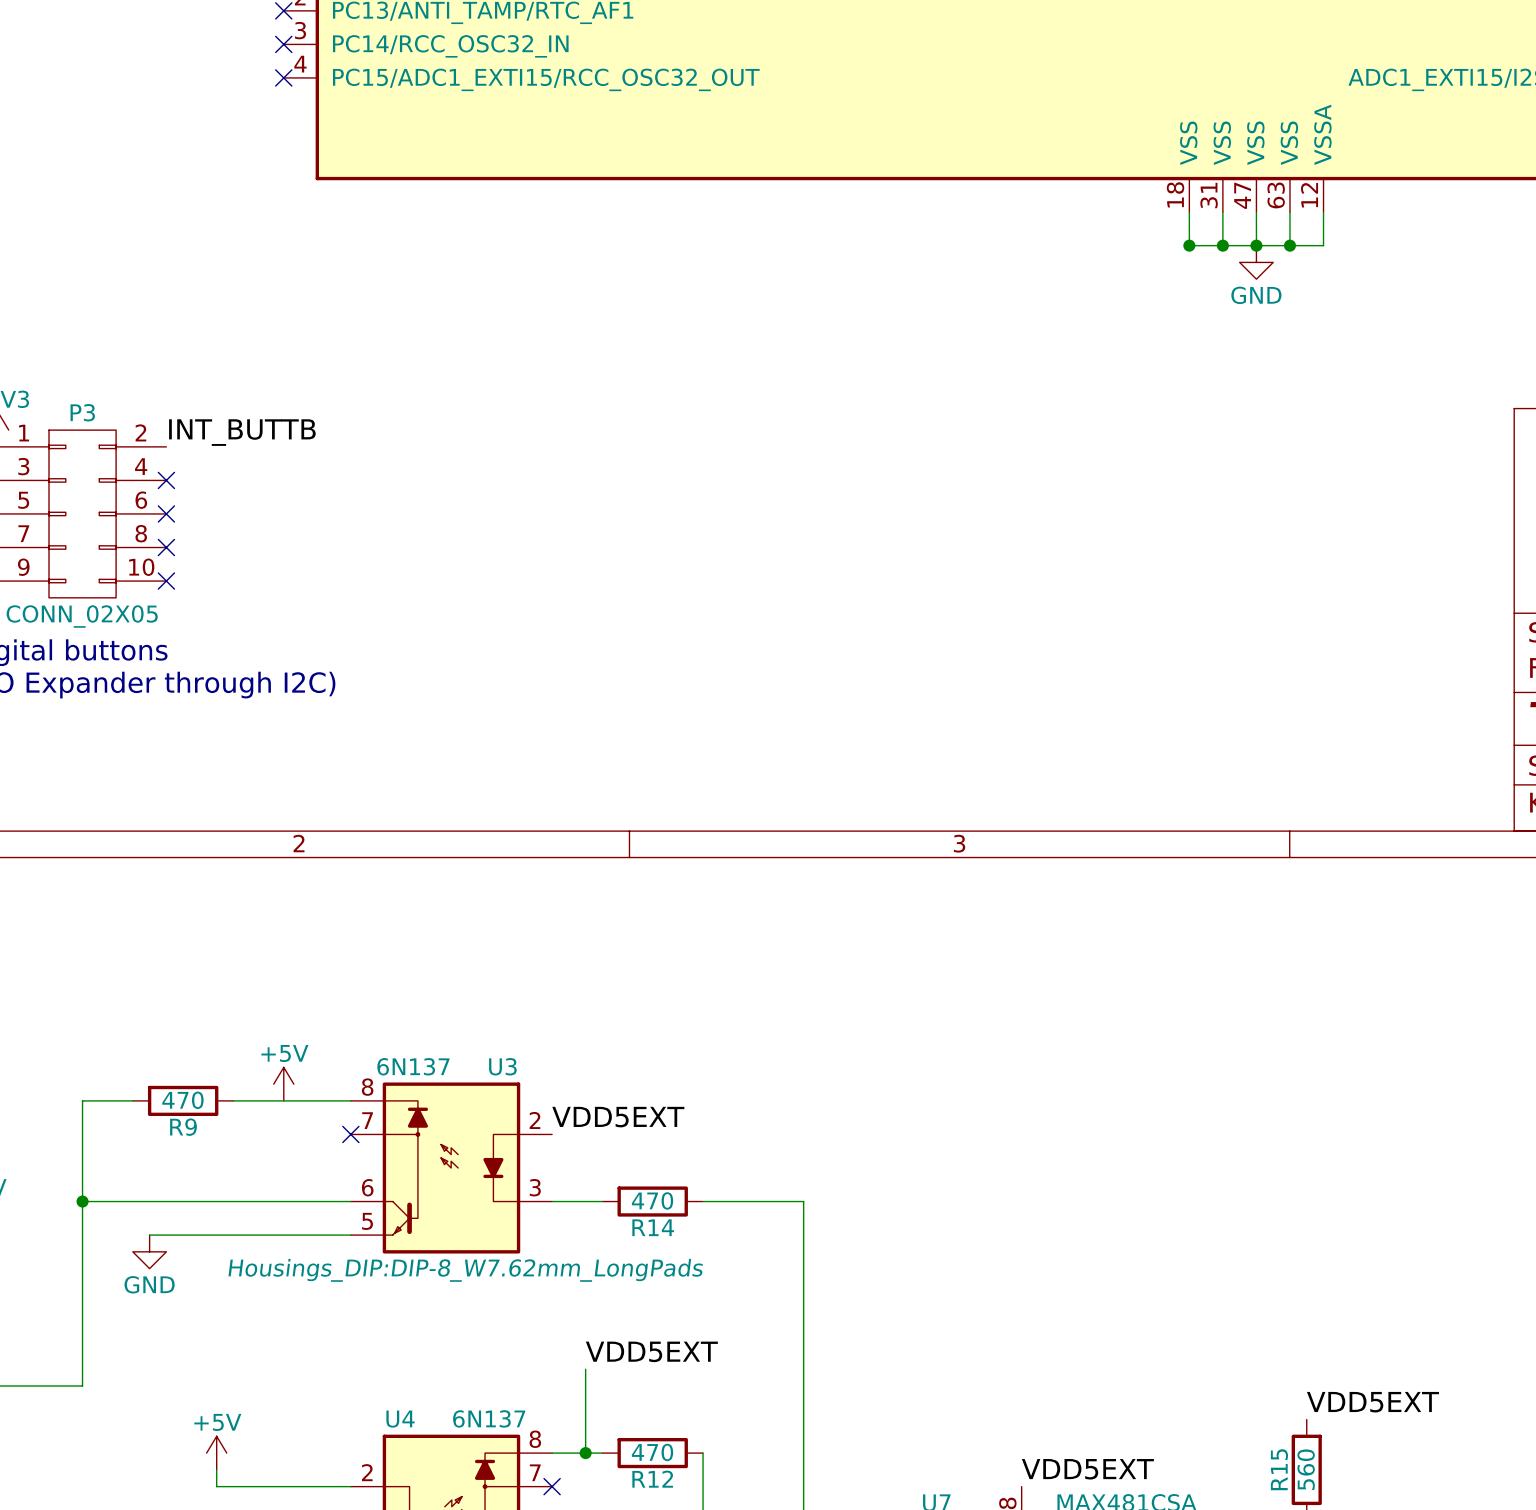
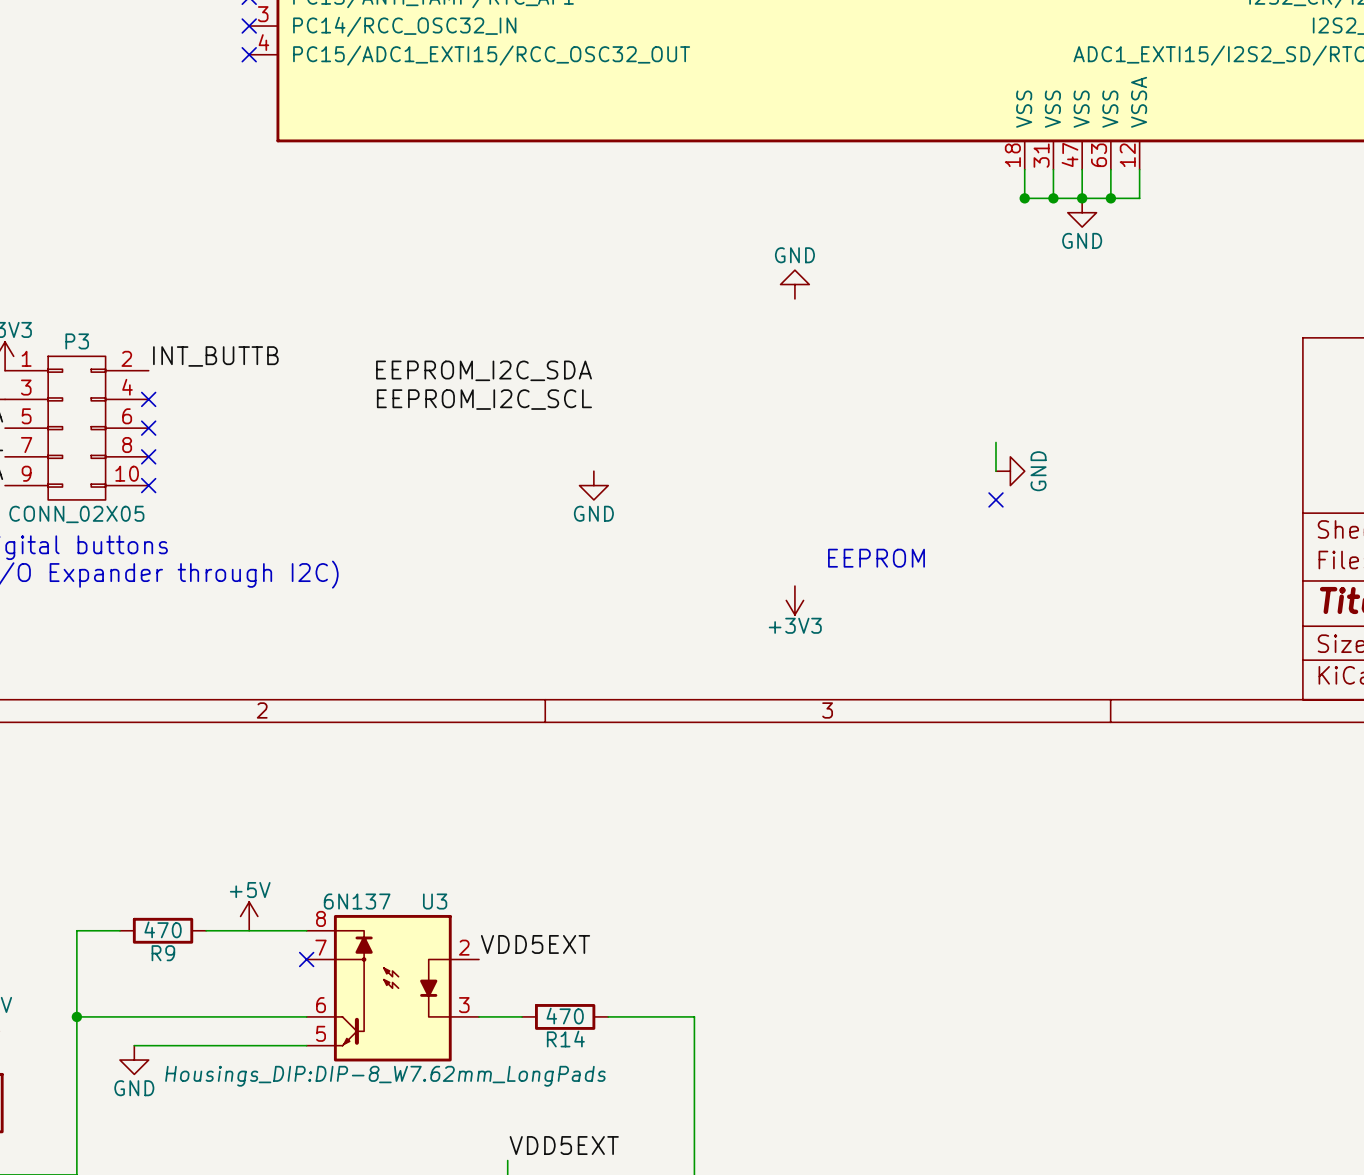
power symbol: none -> GND (794, 284)
label: none -> EEPROM_I2C_SDA (484, 370)
label: none -> EEPROM_I2C_SCL (484, 399)
wire: none -> (995, 442) (995, 471)
power symbol: none -> GND (1010, 471)
power symbol: none -> GND (593, 485)
no-connect mark: none -> (995, 499)
text: none -> EEPROM (876, 558)
power symbol: none -> +3V3 (794, 600)

